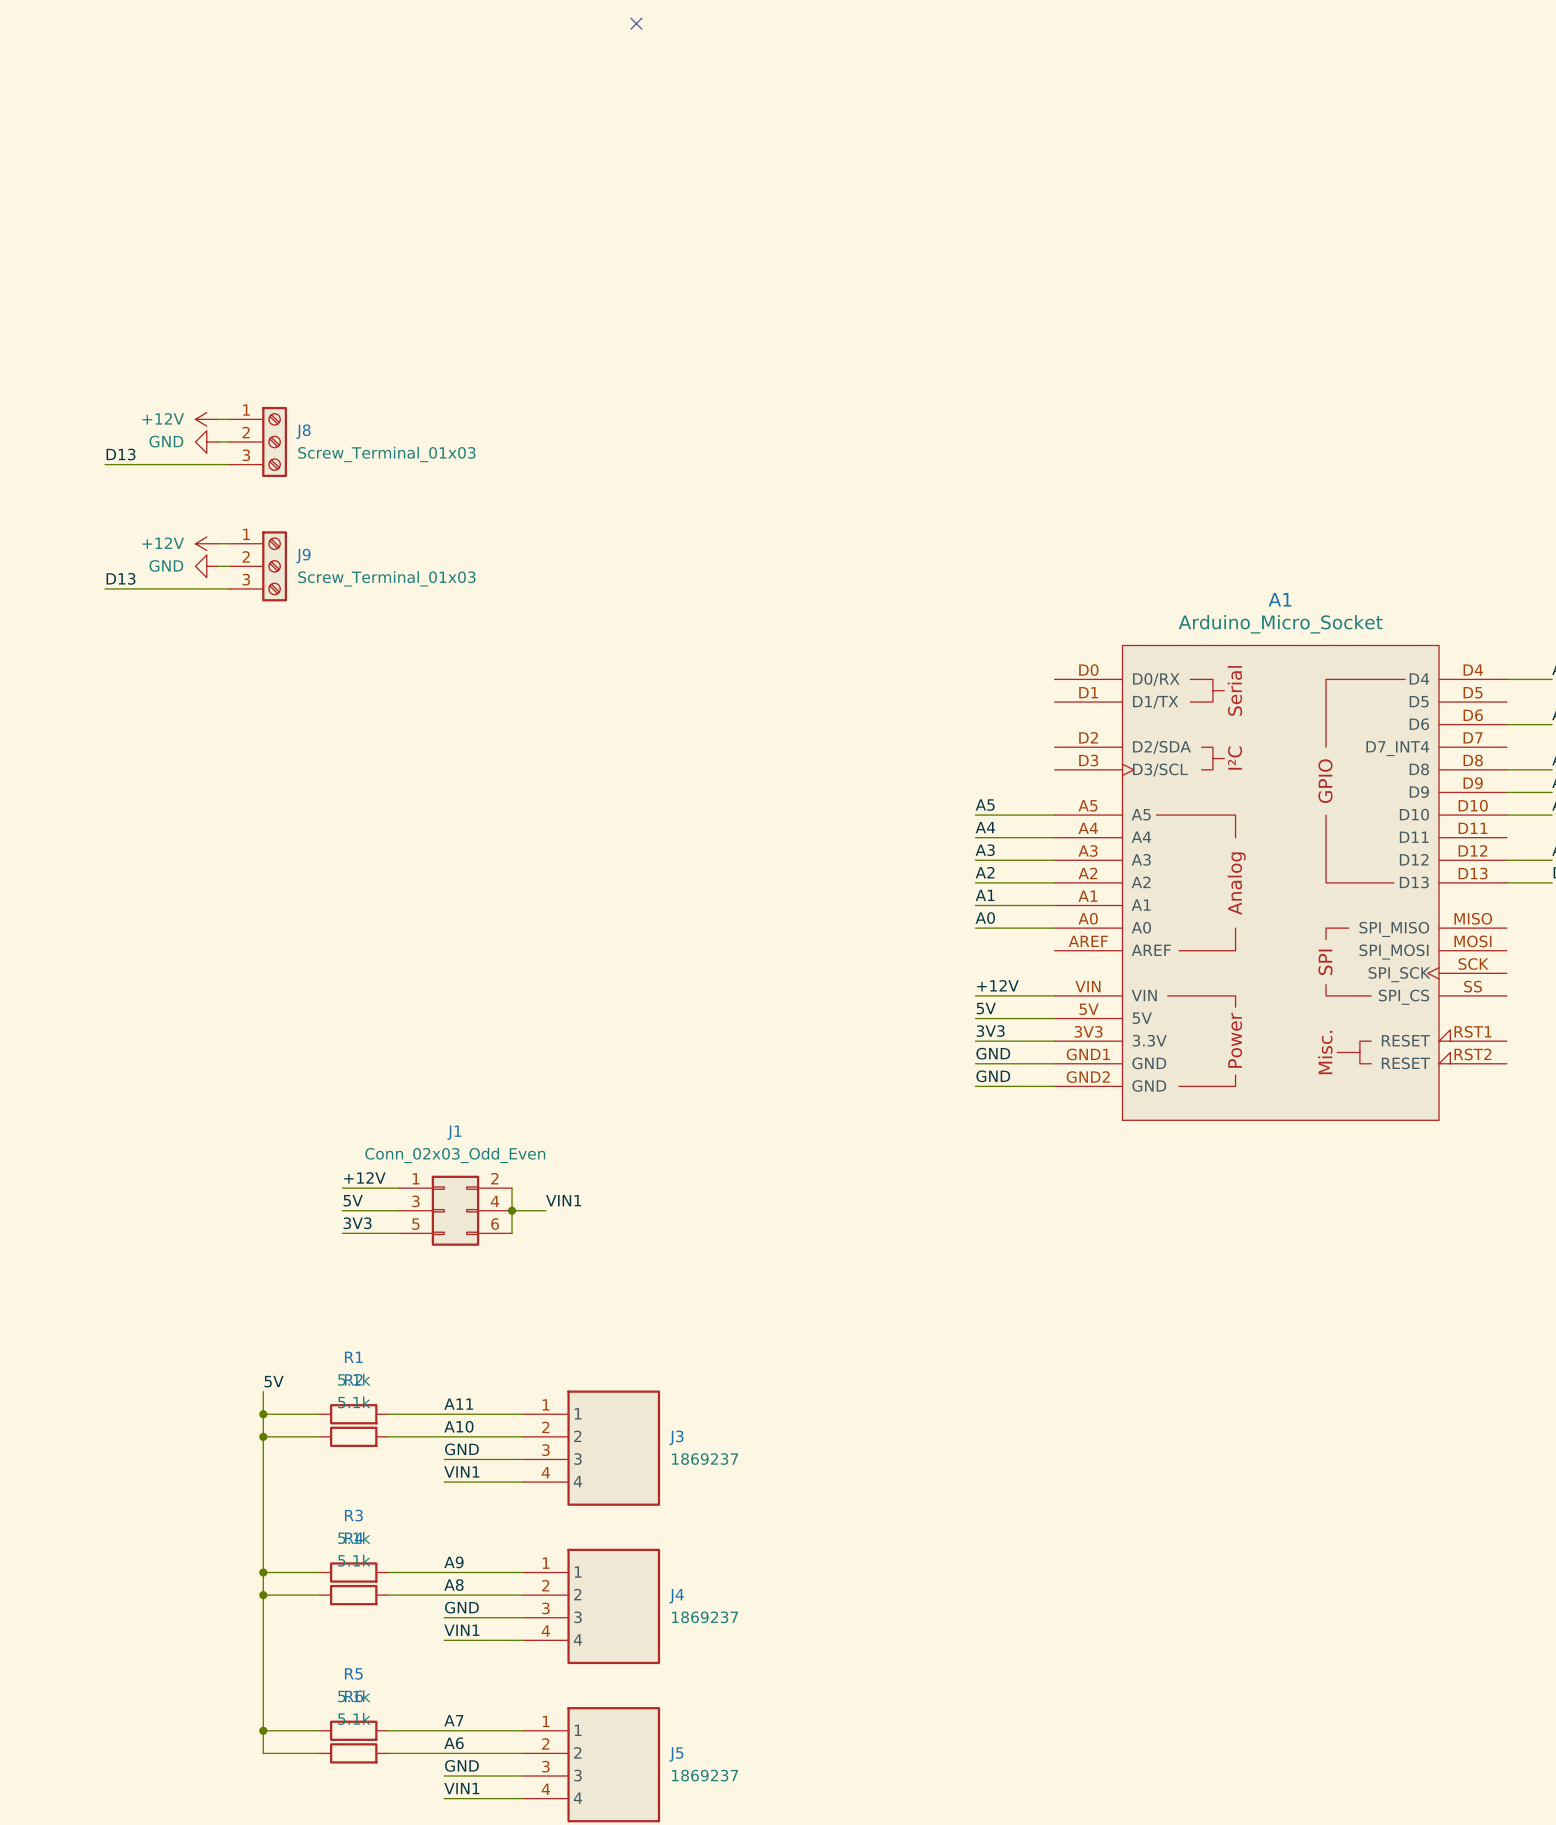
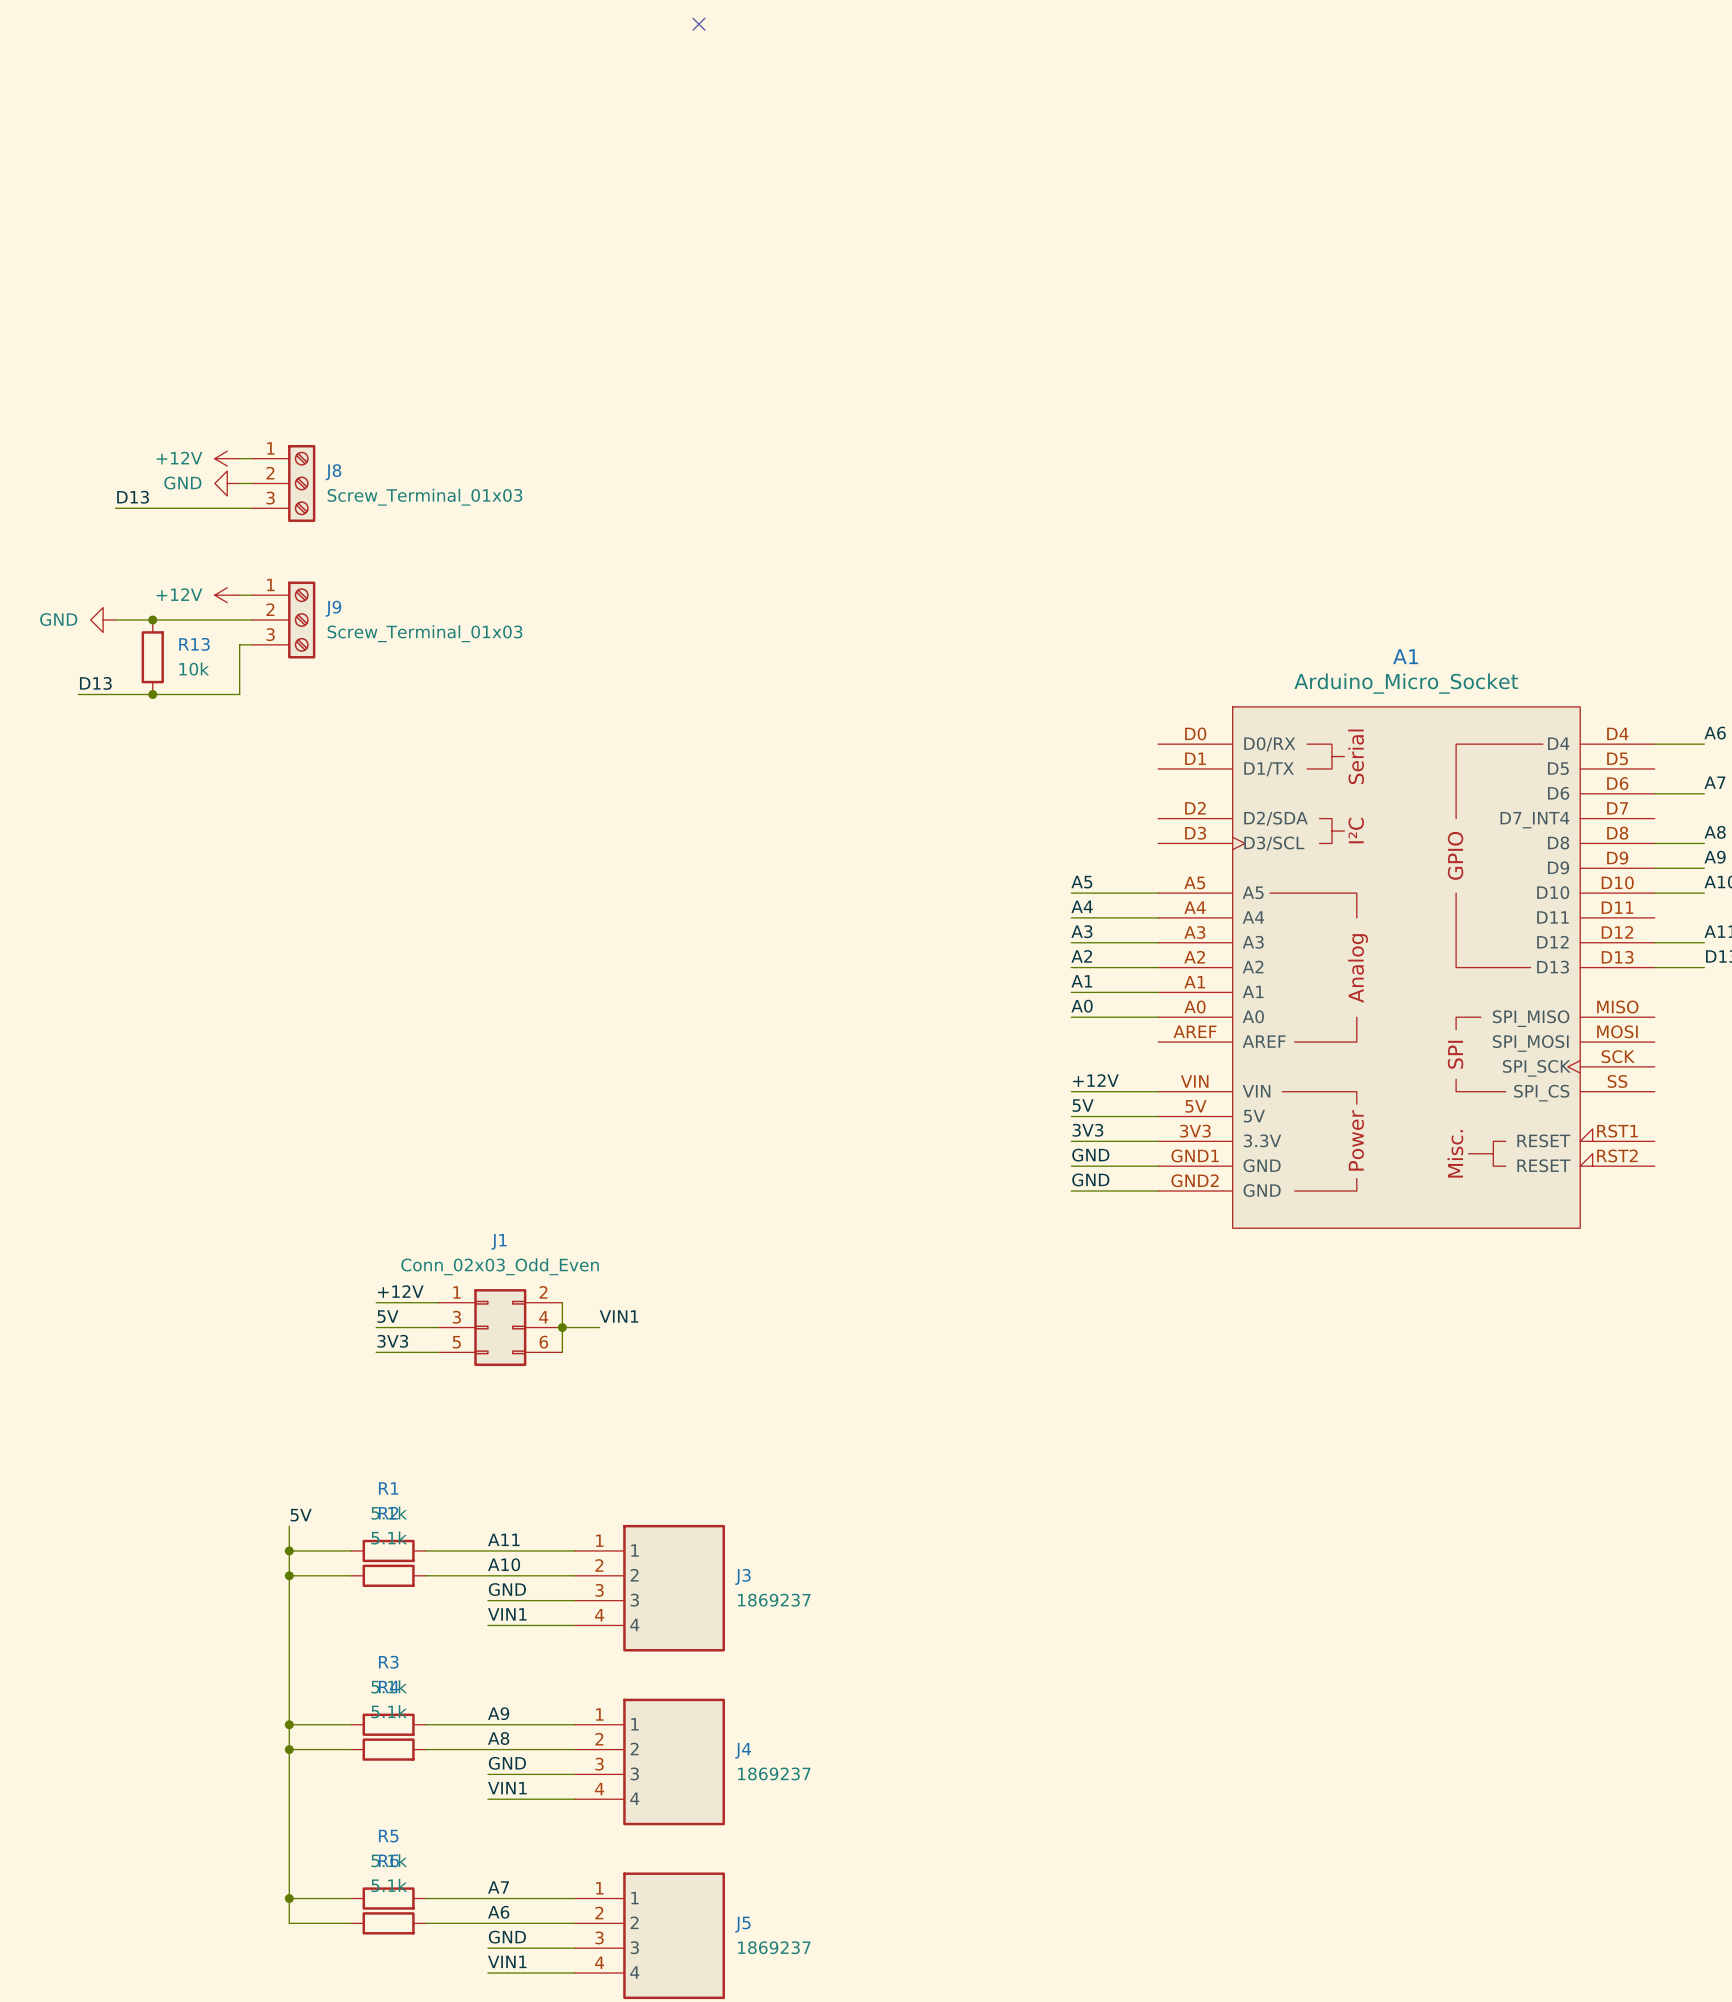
wire: none -> (115, 620) (239, 620)
junction: none -> (152, 620)
power symbol position: GND (206, 566) -> GND (103, 620)
label position: D13 (121, 578) -> D13 (95, 683)
wire: (105, 588) (218, 588) -> (78, 694) (239, 694) (239, 644)
R13: none -> 10k (152, 657)
junction: none -> (152, 694)

